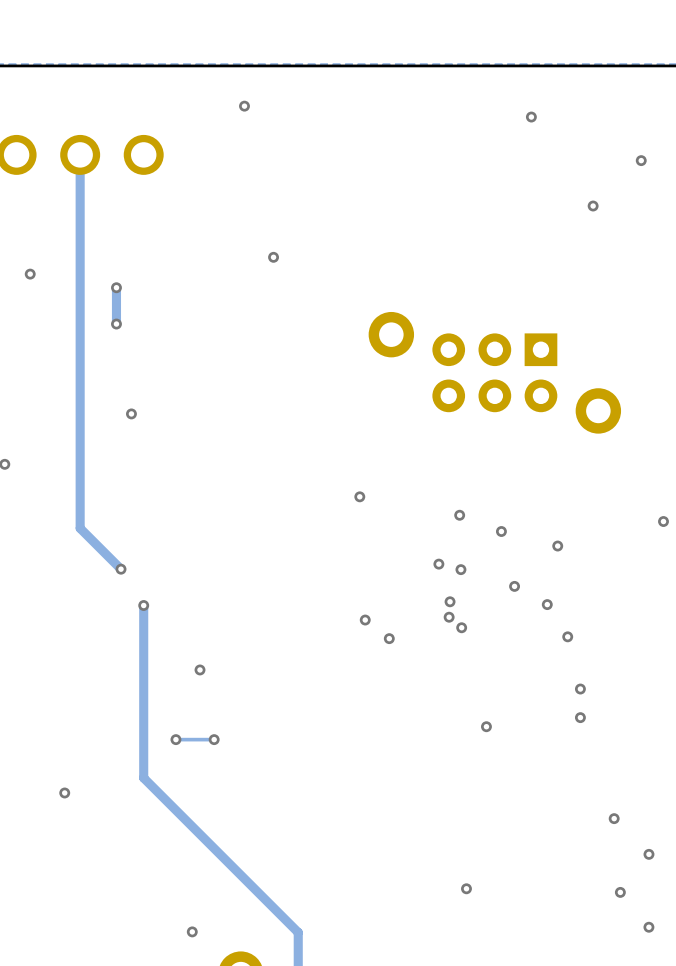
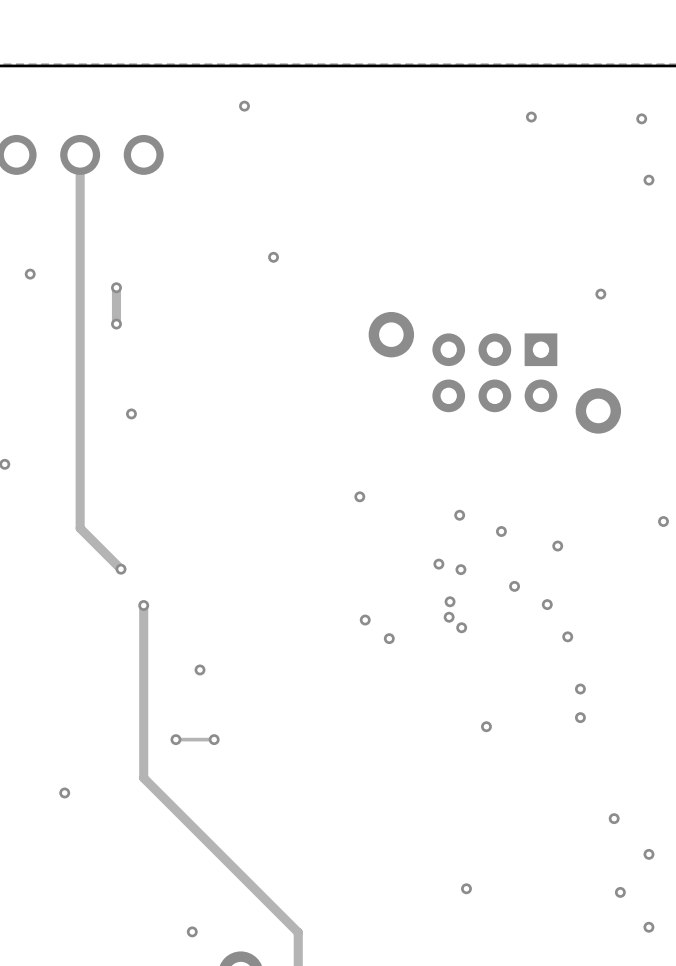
via: none -> (641, 118)
via: (641, 160) -> none
via: none -> (648, 180)
via: (593, 206) -> none
via: none -> (600, 294)

